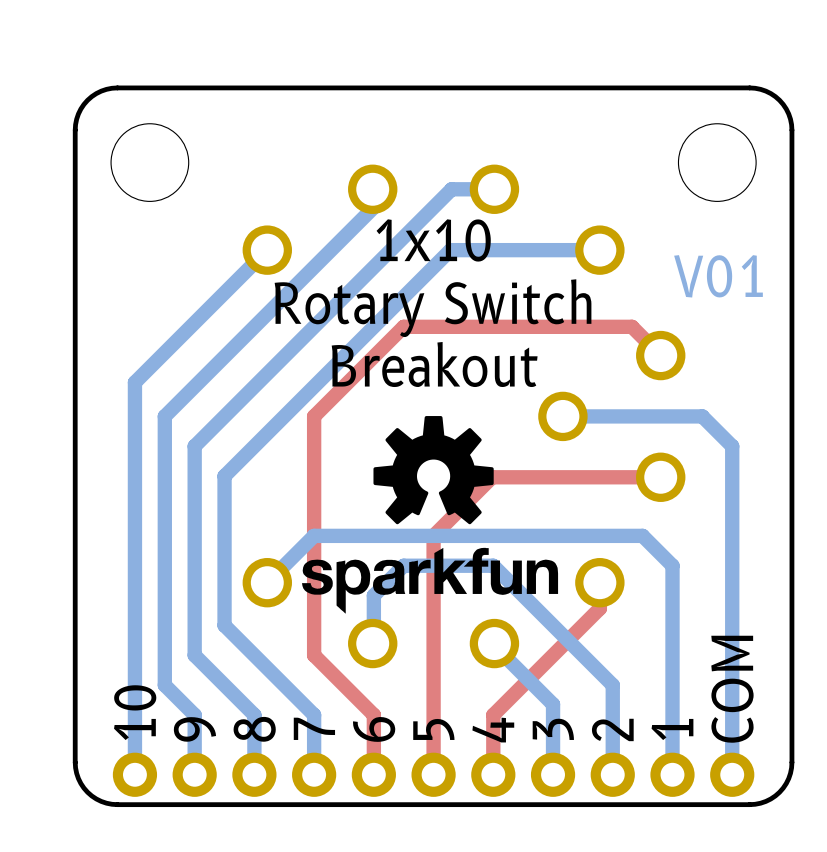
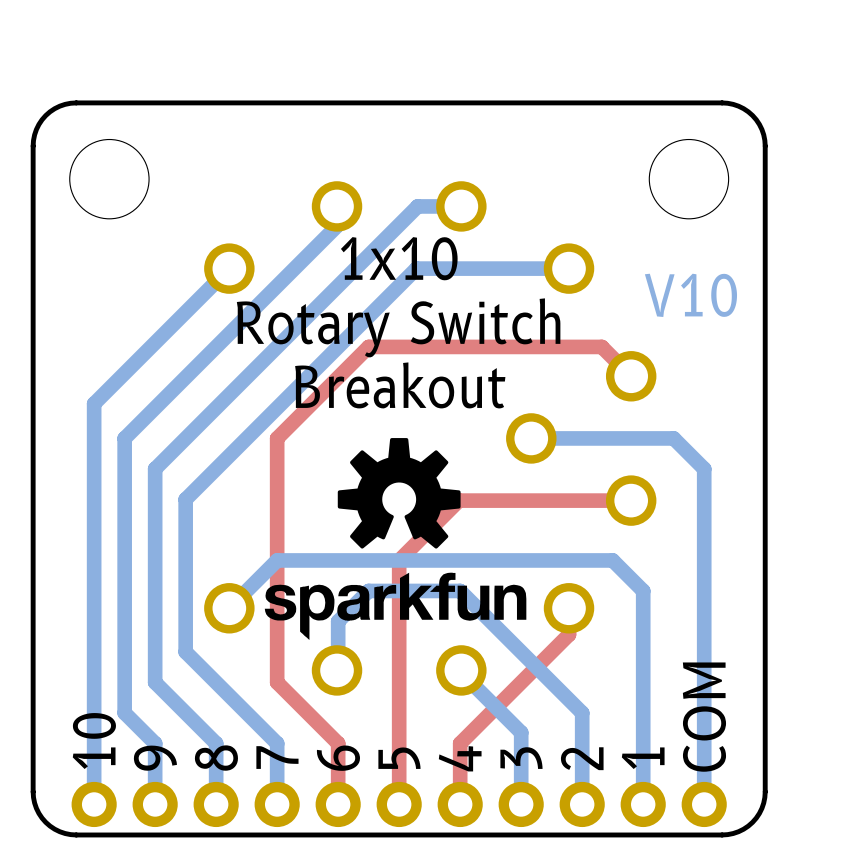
text: V01 (718, 276) -> V10 (690, 295)

